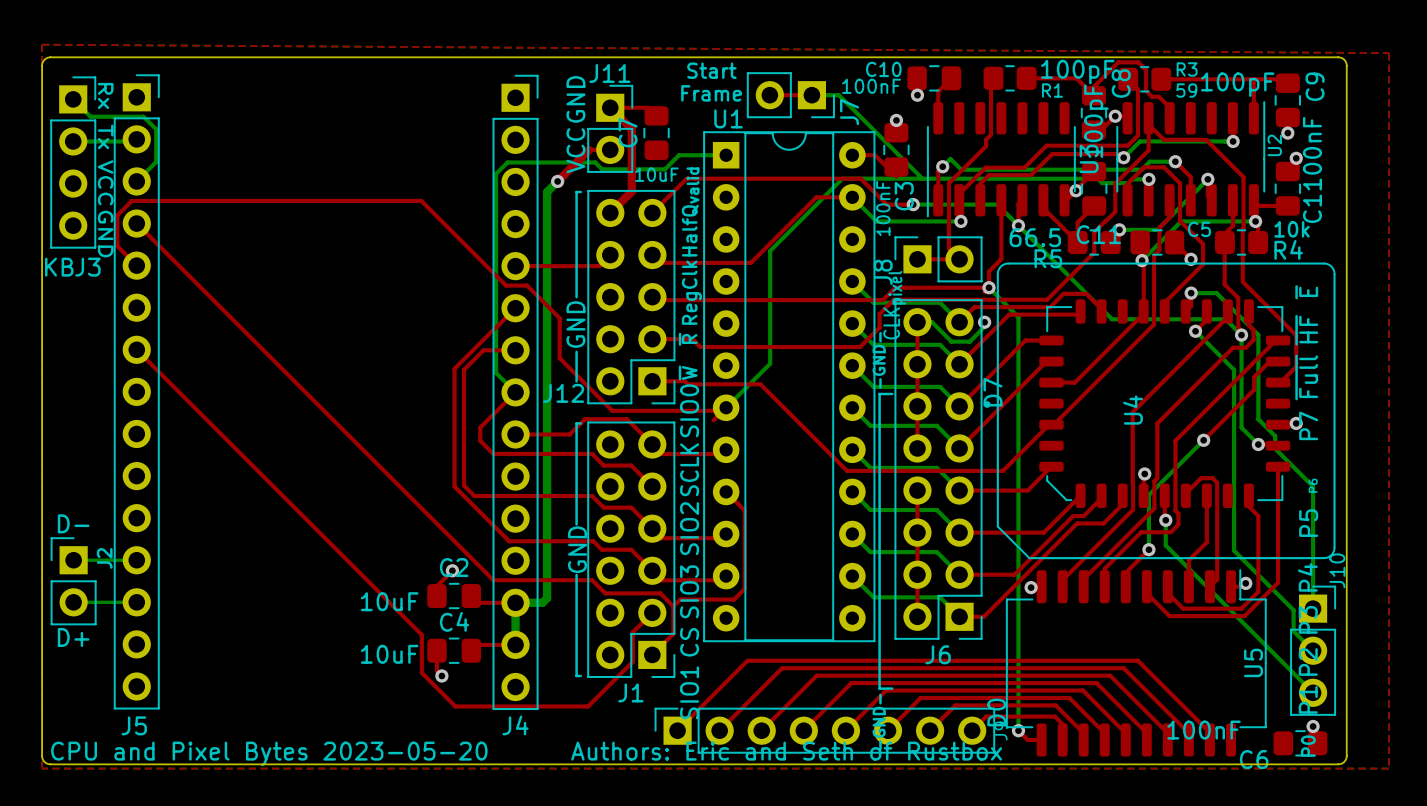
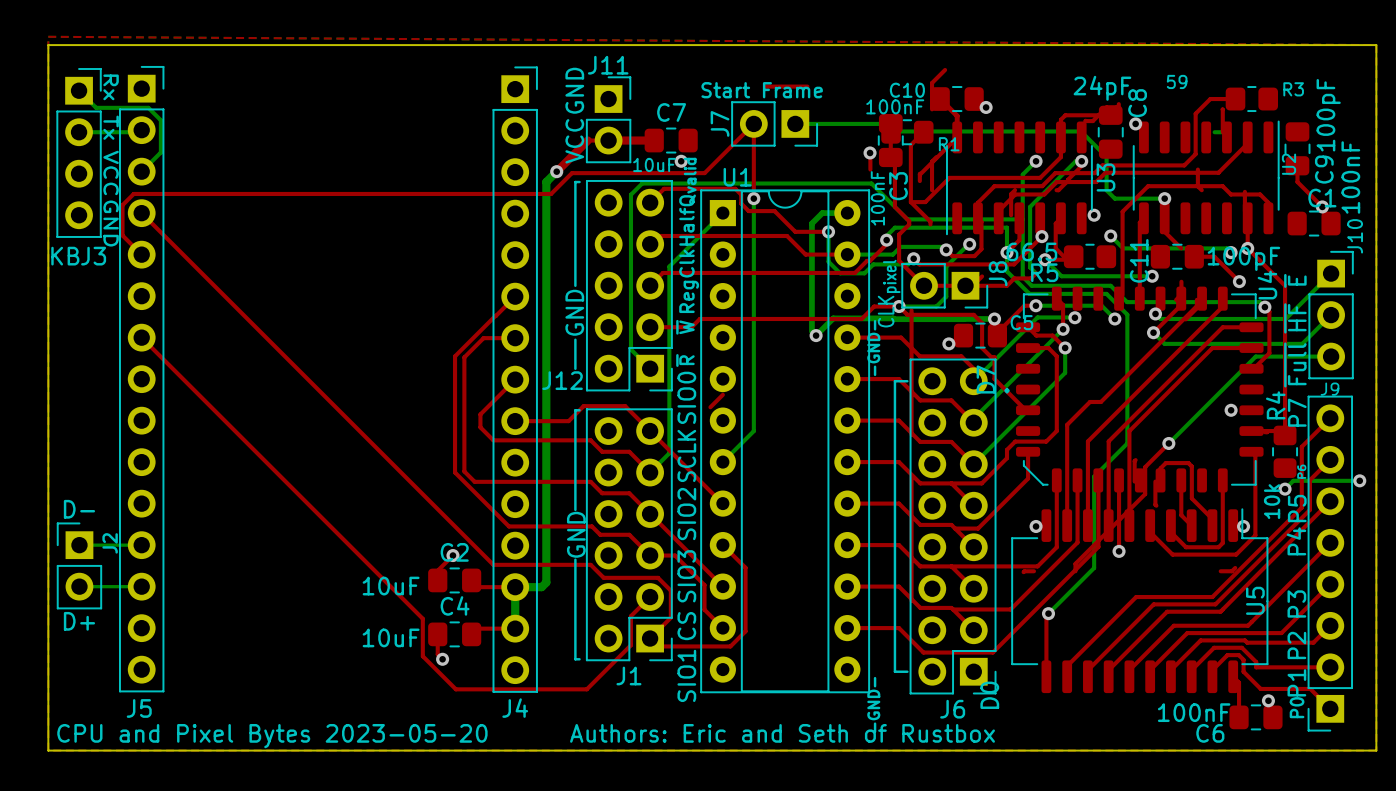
board edge: (42, 65) (44, 59) (50, 57) (1338, 57) (1344, 59) (1346, 65) (1346, 755) (1342, 763) (50, 764) (44, 761) (42, 755) -> (48, 57) (48, 45) (1376, 45) (1376, 750) (48, 750) (48, 738)
text: Start (711, 70) -> none
C8 value: 100pF (1077, 72) -> 24pF (1102, 88)
C10 position: (934, 78) -> (957, 99)
top track: (993, 78) (991, 80) (991, 134) (986, 139) (986, 146) (948, 183) (948, 248) (959, 259) (917, 259) -> none
R1 position: (1010, 78) -> (907, 132)
top track: (1026, 78) (1076, 78) (1093, 95) (1093, 86) (1118, 62) (1138, 62) (1145, 69) (1145, 90) (1152, 96) (1158, 96) (1169, 107) (1169, 118) -> none
top track: (1128, 79) (1137, 89) (1137, 135) (1127, 145) (1046, 145) (1024, 167) (985, 167) (959, 194) -> none
R3 position: (1144, 79) -> (1251, 99)
top track: (1161, 79) (1283, 79) (1287, 83) -> none
top track: (1253, 79) (1253, 118) -> none
C9 value rotation: 0° (1237, 84) -> 90° counterclockwise (1328, 115)
C9 name position: C9 (1315, 86) -> C9 (1324, 169)
text: Frame (711, 93) -> none
J7 position: (790, 95) -> (774, 123)
bottom track: (811, 95) (838, 95) (922, 178) -> none
via: (917, 95) -> none
text: none -> Start Frame (762, 90)
C9 position: (1287, 100) -> (1297, 148)
top track: none -> (940, 99) (957, 115) (957, 137) (919, 174)
top track: none -> (1235, 99) (1210, 99) (1195, 113) (1195, 154) (1184, 165) (1102, 165) (1094, 173) (1055, 173) (1042, 186) (994, 186) (977, 202) (977, 224)
J7 name position: J7 (849, 112) -> J7 (720, 123)
C8 position: (1093, 112) -> (1110, 132)
top track: (656, 115) (648, 107) (610, 107) (631, 129) (631, 191) (610, 212) -> none
via: none -> (986, 107)
via: (1115, 116) -> none
U1 name position: U1 (728, 118) -> U1 (737, 177)
top track: (1148, 118) (1148, 150) (1115, 183) (1115, 211) (1094, 232) (1094, 252) (1047, 299) (893, 299) (879, 314) (879, 327) (860, 347) (700, 347) (692, 339) -> (1028, 410) (1025, 410) (994, 379) (994, 357) (991, 357) (982, 348) (982, 323) (973, 314) (907, 314) (899, 306) (874, 306) (861, 318) (699, 318) (689, 327)
via: (896, 120) -> none
top track: none -> (1110, 115) (1065, 115) (1060, 119) (1060, 157) (1040, 177) (949, 177) (925, 202) (910, 202)
top track: (1148, 124) (1163, 139) (1206, 139) (1243, 177) (1242, 281) (1296, 335) -> (1247, 218) (1247, 248) (1285, 285) (1285, 323)
C7 rotation: 0° (656, 133) -> 90° clockwise (671, 140)
bottom track: none -> (795, 123) (882, 123) (890, 131) (1081, 131) (1106, 156) (1106, 190) (1114, 198) (1164, 198)
via: none -> (1135, 123)
via: (1287, 133) -> none
top track: none -> (891, 132) (890, 161) (894, 165) (894, 206) (909, 221) (909, 224) (899, 234) (899, 260) (923, 285) (1006, 285) (1014, 278) (1030, 278) (1036, 273)
top track: none -> (923, 132) (910, 145) (910, 202)
bottom track: (1224, 141) (1139, 141) (1123, 157) -> none
via: (1233, 141) -> none
top track: none -> (1247, 137) (1247, 143) (1218, 172) (1105, 172) (1096, 182) (1056, 182) (1044, 194) (1015, 194) (998, 211) (998, 218)
top track: none -> (608, 140) (654, 140)
bottom track: (726, 155) (679, 155) (664, 169) (602, 169) (595, 162) (507, 162) (496, 173) (496, 372) (515, 392) -> none
top track: (852, 155) (875, 155) (896, 176) -> none
top track: (1123, 157) (1120, 154) (1052, 154) (1031, 175) (989, 175) (980, 183) (980, 200) -> none
via: (1123, 157) -> none
bottom track: (1172, 158) (1175, 161) (1149, 161) (1141, 169) (961, 169) (950, 158) (942, 166) -> none
U2 position: (1190, 158) -> (1206, 177)
via: (1296, 158) -> none
U3 position: (1001, 159) -> (1019, 178)
top track: (1175, 161) (1190, 177) (1190, 200) -> none
via: (1175, 161) -> none
top track: none -> (870, 152) (870, 169)
via: none -> (870, 152)
via: (942, 166) -> none
via: none -> (681, 161)
bottom track: none -> (1036, 161) (1022, 174) (1022, 276) (1031, 285) (1110, 285) (1127, 302) (1259, 302) (1264, 307)
via: none -> (1036, 161)
bottom track: none -> (1081, 161) (1075, 161) (1030, 206) (1030, 267) (1036, 273)
via: none -> (1081, 161)
top track: none -> (1297, 165) (1297, 182) (1324, 208) (1324, 219)
bottom track: (1148, 179) (1132, 179) (1128, 183) (1102, 183) (1097, 178) (842, 178) (770, 250) (770, 363) (726, 407) -> none
via: (1148, 179) -> none
bottom track: (1207, 179) (1157, 229) (1119, 229) -> none
via: (1207, 179) -> none
top track: none -> (919, 173) (919, 181)
C11 rotation: 0° (1094, 188) -> 90° clockwise (1177, 256)
C11 position: (1094, 188) -> (1177, 256)
C1 rotation: 0° (1287, 188) -> 90° clockwise (1314, 223)
C1 position: (1287, 188) -> (1314, 223)
via: (1076, 190) -> none
top track: (852, 197) (816, 197) (750, 262) (654, 262) -> none
bottom track: (852, 197) (876, 221) (960, 221) -> none
top track: (666, 198) (686, 178) (860, 178) (886, 204) (913, 204) -> (664, 188) (735, 188) (741, 194) (741, 203) (748, 211) (774, 211) (795, 231) (828, 231)
top track: (1001, 200) (1001, 259) (989, 271) (989, 287) (895, 287) (882, 300) (655, 300) (652, 297) -> none
top track: (1043, 200) (1043, 208) (1077, 242) (1077, 222) (1094, 205) -> none
top track: (1127, 200) (1127, 183) (1143, 167) (1164, 167) (1180, 183) (1180, 221) (1203, 244) (1203, 264) (1164, 302) (1164, 311) -> none
top track: (1169, 200) (1169, 217) (1159, 227) (1159, 250) (1154, 255) (1154, 324) (1053, 424) (1049, 424) (1002, 470) (847, 470) (760, 384) (687, 384) (684, 381) (652, 381) -> none
top track: (1232, 200) (1233, 225) (1224, 233) (1224, 284) (1238, 298) (1238, 327) (1241, 330) (1241, 335) -> none
top track: (1253, 200) (1259, 205) (1287, 205) -> none
top track: (128, 204) (131, 200) (421, 200) (506, 285) (527, 285) (559, 318) (559, 358) (612, 410) (713, 410) -> (133, 193) (551, 193) (571, 173) (704, 173) (753, 123) (753, 198)
bottom track: (913, 204) (997, 204) (1110, 317) -> (1035, 305) (1101, 305)
via: (913, 204) -> none
bottom track: none -> (753, 198) (753, 431) (722, 462)
via: none -> (753, 198)
via: none -> (1164, 198)
C1 name position: C1 (1312, 208) -> C1 (1322, 198)
top track: none -> (910, 202) (930, 221) (930, 224)
via: none -> (1322, 206)
via: (960, 221) -> none
bottom track: (1255, 221) (1181, 221) (1142, 260) -> none
via: (1255, 221) -> none
bottom track: none -> (722, 213) (669, 266) (669, 453) (650, 472)
bottom track: none -> (847, 213) (822, 213) (811, 223) (811, 331) (816, 335) (833, 318) (963, 319)
via: (1018, 225) -> none
via: none -> (1094, 215)
top track: none -> (977, 218) (981, 221) (981, 249) (974, 256) (952, 256) (946, 249)
top track: none -> (1019, 218) (1019, 240) (1011, 248)
top track: none -> (1040, 218) (1041, 220) (1041, 236) (1014, 264) (919, 264) (913, 258)
top track: none -> (1060, 218) (1055, 223) (1055, 248) (1064, 256) (1073, 256) (1070, 259) (1045, 259)
top track: none -> (1143, 218) (1139, 222) (1139, 298)
bottom track: none -> (1022, 219) (907, 219) (871, 183) (642, 183) (630, 194) (630, 349) (650, 368)
via: (1119, 229) -> none
top track: none -> (1269, 219) (1268, 202) (1260, 194) (1230, 194) (1222, 186) (1148, 186) (1122, 211) (1122, 295)
bottom track: none -> (828, 231) (828, 261) (840, 273) (864, 273) (873, 264) (908, 264) (913, 258)
via: none -> (828, 231)
R5 position: (1094, 242) -> (1090, 256)
top track: (1140, 242) (1143, 246) (1143, 313) (1074, 382) (1051, 382) -> none
C5 position: (1157, 242) -> (980, 335)
R4 rotation: 0° (1241, 242) -> 90° clockwise (1285, 451)
R4 position: (1241, 242) -> (1285, 451)
bottom track: none -> (1110, 235) (1123, 248) (1226, 248) (1231, 252)
via: none -> (1110, 235)
via: none -> (1041, 236)
R4 name position: R4 (1288, 249) -> R4 (1275, 405)
top track: none -> (886, 240) (886, 244) (854, 272) (662, 272) (654, 280)
bottom track: none -> (886, 240) (886, 235) (894, 227) (1006, 227) (1006, 271) (1029, 293) (1106, 293) (1127, 314) (1127, 443) (1094, 476) (1094, 567) (1048, 613)
via: none -> (886, 240)
top track: none -> (651, 242) (658, 235) (787, 235) (805, 254) (847, 254)
top track: (610, 255) (599, 266) (515, 266) -> none
bottom track: none -> (969, 244) (946, 266) (946, 296) (936, 306) (899, 306)
via: none -> (969, 244)
J8 rotation: 0° (938, 259) -> 180° (944, 285)
via: (1191, 259) -> none
via: none -> (1247, 248)
bottom track: none -> (946, 249) (943, 246) (900, 246) (892, 254) (847, 254)
via: none -> (946, 249)
via: (1142, 260) -> none
U4 footprint: [984, 262, 1336, 560] -> [1016, 286, 1264, 493]
via: none -> (1006, 252)
via: none -> (1231, 252)
top track: none -> (1190, 256) (1214, 256) (1239, 281)
via: none -> (913, 258)
bottom track: none -> (1045, 259) (1061, 276) (1152, 276)
via: none -> (1045, 259)
bottom track: (852, 281) (873, 302) (940, 302) (959, 322) -> none
bottom track: none -> (1331, 273) (1285, 318) (1160, 318) (1155, 313)
bottom track: (989, 287) (1018, 317) (1018, 730) -> none
via: (989, 287) -> none
via: none -> (1152, 276)
via: none -> (1239, 281)
bottom track: (1191, 293) (1216, 293) (1258, 334) (1258, 419) (1275, 436) (1275, 448) (1313, 486) (1313, 608) -> none
via: (1191, 293) -> none
top track: none -> (1056, 298) (1063, 304) (1063, 329)
top track: none -> (1202, 298) (1202, 300) (1100, 401) (1090, 401) (1067, 424) (1067, 525)
top track: none -> (1222, 298) (1222, 306) (1087, 441) (1087, 525)
top track: (1080, 311) (1077, 314) (1009, 314) (959, 364) -> none
top track: (1101, 311) (1101, 309) (1086, 293) (1063, 293) (1050, 307) (974, 307) (959, 322) -> none
top track: (1227, 311) (1227, 316) (1132, 412) (1133, 509) (1062, 580) (1062, 586) -> none
top track: (1248, 311) (1248, 325) (1253, 330) (1253, 340) (1245, 347) (1233, 347) (1157, 423) (1157, 478) -> (1168, 443) (1148, 464)
top track: none -> (1035, 305) (1024, 305) (994, 335)
via: none -> (1035, 305)
via: none -> (899, 306)
top track: none -> (1264, 307) (1269, 311) (1269, 353) (1251, 368)
via: none -> (1264, 307)
bottom track: (1112, 319) (1225, 319) (1241, 335) (1241, 427) (1258, 444) -> (1103, 307) (1114, 318)
top track: none -> (1178, 307) (1178, 301) (1181, 298) (1181, 304) (1153, 332)
bottom track: (917, 322) (932, 322) (951, 341) (969, 341) (984, 326) (984, 322) -> none
via position: (984, 322) -> (994, 318)
bottom track: (852, 323) (873, 344) (940, 344) (959, 364) -> none
via: none -> (1155, 313)
bottom track: none -> (1331, 315) (1302, 343) (1164, 343) (1153, 332)
bottom track: none -> (1074, 317) (1037, 317) (973, 381)
via: none -> (1074, 317)
bottom track: none -> (964, 318) (994, 318)
via: none -> (1114, 318)
bottom track: (1195, 331) (1234, 369) (1234, 550) (1293, 610) (1293, 631) (1313, 650) -> none
via: (1195, 331) -> none
via: (1241, 335) -> none
text: ~{R} (688, 339) -> ~{W} (685, 327)
top track: none -> (1028, 327) (1036, 335) (1052, 335) (1065, 347)
top track: none -> (1251, 327) (1222, 327) (1108, 441) (1108, 525)
top track: (1051, 340) (1025, 340) (959, 406) -> none
top track: (1278, 340) (1275, 340) (1175, 440) (1175, 510) (1178, 513) (1178, 524) (1170, 532) (1141, 532) (1104, 568) (1104, 586) -> none
bottom track: none -> (1063, 329) (973, 418) (973, 422)
via: none -> (1063, 329)
via: none -> (1153, 332)
via: none -> (816, 335)
top track: none -> (847, 337) (901, 337) (919, 356) (961, 356) (973, 368) (973, 381)
via: none -> (948, 343)
top track: none -> (1028, 348) (1048, 348) (1056, 356) (1056, 431) (1046, 441) (1015, 441) (1006, 449) (1006, 458) (981, 483) (920, 483) (899, 462) (847, 462)
bottom track: none -> (1065, 347) (1065, 372) (973, 464)
via: none -> (1065, 347)
top track: none -> (1251, 348) (1212, 348) (1129, 431) (1129, 525)
top track: (1051, 361) (1046, 361) (959, 448) -> none
top track: (1278, 361) (1269, 361) (1254, 377) (1254, 389) (1203, 440) -> none
bottom track: (852, 365) (873, 386) (940, 386) (959, 406) -> none
top track: (1296, 366) (1280, 382) (1278, 382) -> (1285, 354) (1285, 435) (1280, 431) (1265, 431)
bottom track: none -> (1331, 356) (1255, 356) (1168, 443)
text: ~{W} (688, 372) -> ~{R} (685, 360)
U1 position: (789, 386) -> (785, 441)
top track: none -> (847, 379) (899, 379) (920, 400) (951, 400) (973, 422)
line: (892, 394) (879, 394) (879, 688) (892, 688) -> (907, 381) (894, 381) (894, 671) (907, 671)
text: none -> . (1006, 390)
bottom track: (852, 407) (870, 425) (936, 425) (959, 448) -> none
U4 name position: U4 (1133, 410) -> U4 (1267, 285)
via: none -> (1231, 410)
via: (1296, 423) -> none
top track: none -> (1330, 418) (1301, 446) (1301, 507) (1212, 597) (1136, 597) (1067, 666) (1067, 676)
top track: none -> (847, 420) (899, 420) (920, 441) (951, 441) (973, 464)
bottom track: (1203, 440) (1148, 495) (1148, 549) -> none
via: (1203, 440) -> none
top track: none -> (650, 431) (722, 503)
via: (1258, 444) -> none
bottom track: (852, 449) (870, 467) (936, 467) (959, 490) -> none
top track: (652, 454) (721, 454) -> none
via: none -> (1168, 443)
top track: none -> (1028, 451) (1028, 478) (978, 528) (955, 528)
top track: none -> (1251, 451) (1255, 455) (1255, 535) (1236, 554) (1172, 554) (1150, 532) (1150, 525)
top track: (1051, 466) (1027, 490) (959, 490) -> none
top track: (1278, 466) (1278, 582) (1244, 616) (1169, 616) (1146, 593) (1146, 586) -> none
J6 position: (938, 469) -> (953, 526)
via: (1144, 473) -> none
top track: none -> (1330, 459) (1309, 480) (1309, 509) (1215, 604) (1153, 604) (1087, 670) (1087, 676)
top track: (726, 491) (744, 510) (744, 588) (734, 599) (680, 599) (673, 606) -> none
bottom track: (852, 491) (870, 510) (936, 510) (959, 532) -> none
top track: none -> (1056, 480) (1056, 547) (1037, 566) (920, 566) (899, 545) (847, 545)
top track: none -> (1077, 480) (1077, 542) (1010, 609) (953, 609)
top track: none -> (1098, 480) (1098, 546) (992, 652) (923, 652) (899, 628) (847, 628)
top track: none -> (1119, 480) (1119, 551)
top track: none -> (1160, 480) (1160, 468) (1165, 463) (1188, 463) (1191, 466) (1191, 498) (1212, 519) (1212, 525)
top track: none -> (1181, 480) (1181, 515) (1191, 525)
top track: none -> (1222, 480) (1222, 543) (1218, 547) (1186, 547) (1170, 532) (1170, 525)
top track: (1080, 495) (1043, 532) (959, 532) -> none
top track: (1101, 495) (1101, 498) (1083, 516) (1073, 516) (1014, 574) (959, 574) -> none
top track: (1122, 495) (1122, 504) (1103, 523) (1077, 523) (983, 616) (959, 616) -> none
top track: (1185, 495) (1185, 493) (1201, 478) (1212, 478) (1217, 482) (1217, 579) (1209, 586) -> none
top track: (1206, 495) (1206, 542) (1188, 560) (1188, 586) -> none
top track: (1248, 495) (1248, 506) (1258, 516) (1258, 591) (1241, 608) (1183, 608) (1167, 593) (1167, 586) -> none
bottom track: none -> (1359, 480) (1293, 480) (1285, 489)
via: none -> (1359, 480)
top track: none -> (951, 483) (973, 505)
via: none -> (1285, 489)
top track: none -> (1330, 501) (1220, 611) (1167, 611) (1108, 670) (1108, 676)
top track: none -> (847, 503) (899, 503) (920, 524) (951, 524) (973, 547)
bottom track: (1165, 520) (1165, 545) (1313, 692) -> none
via: (1165, 520) -> none
top track: none -> (650, 514) (722, 586)
bottom track: (852, 534) (870, 552) (936, 552) (959, 574) -> none
top track: (652, 538) (721, 538) -> none
via: none -> (1036, 526)
top track: (1148, 549) (1125, 572) (1125, 586) -> none
via position: (1148, 549) -> (1119, 551)
top track: none -> (1330, 542) (1248, 625) (1173, 625) (1129, 670) (1129, 676)
top track: none -> (722, 545) (745, 567) (745, 631) (730, 646) (658, 646) (650, 638)
top track: none -> (650, 555) (674, 555) (704, 585) (704, 609) (722, 628)
bottom track: (852, 576) (873, 597) (940, 597) (959, 616) -> none
text position: P4 (1307, 577) -> P4 (1296, 541)
top track: (652, 580) (721, 580) -> none
top track: none -> (951, 566) (973, 588)
via position: (1245, 583) -> (1243, 526)
via: (1031, 587) -> none
top track: none -> (1330, 584) (1281, 633) (1187, 633) (1150, 670) (1150, 676)
top track: none -> (847, 586) (899, 586) (920, 607) (951, 607) (973, 630)
top track: none -> (1048, 613) (1046, 615) (1046, 676)
via: none -> (1048, 613)
top track: none -> (1330, 625) (1313, 642) (1200, 640) (1170, 670) (1170, 676)
J10 position: (1313, 650) -> (1331, 315)
U5 position: (1136, 662) -> (1139, 600)
top track: none -> (1330, 667) (1256, 667) (1256, 662) (1241, 647) (1214, 647) (1191, 670) (1191, 676)
top track: none -> (1212, 676) (1212, 670) (1227, 655) (1238, 655) (1243, 659) (1243, 671) (1260, 688) (1310, 688) (1330, 708)
top track: none -> (1233, 676) (1239, 682) (1239, 717)
via position: (1313, 726) -> (1268, 700)
top track: (677, 730) (747, 660) (1137, 660) (1209, 732) (1209, 739) -> none
top track: (719, 730) (782, 668) (1123, 668) (1188, 733) (1188, 739) -> none
top track: (761, 730) (816, 675) (1110, 675) (1167, 733) (1167, 739) -> none
top track: (803, 730) (851, 683) (1096, 683) (1146, 733) (1146, 739) -> none
J9 rotation: 0° (824, 730) -> 90° counterclockwise (1330, 563)
J9 position: (824, 730) -> (1330, 563)
top track: (845, 730) (886, 690) (1083, 690) (1125, 733) (1125, 739) -> none
top track: (888, 730) (920, 697) (1069, 697) (1104, 733) (1104, 739) -> none
top track: (930, 730) (955, 705) (1055, 705) (1083, 733) (1083, 739) -> none
top track: (972, 730) (986, 716) (1054, 716) (1062, 724) (1062, 739) -> none
top track: (1018, 730) (1027, 739) (1041, 739) -> none
via: (1018, 730) -> none
C6 position: (1300, 743) -> (1256, 717)
text position: P0 (1308, 746) -> P0 (1297, 707)

